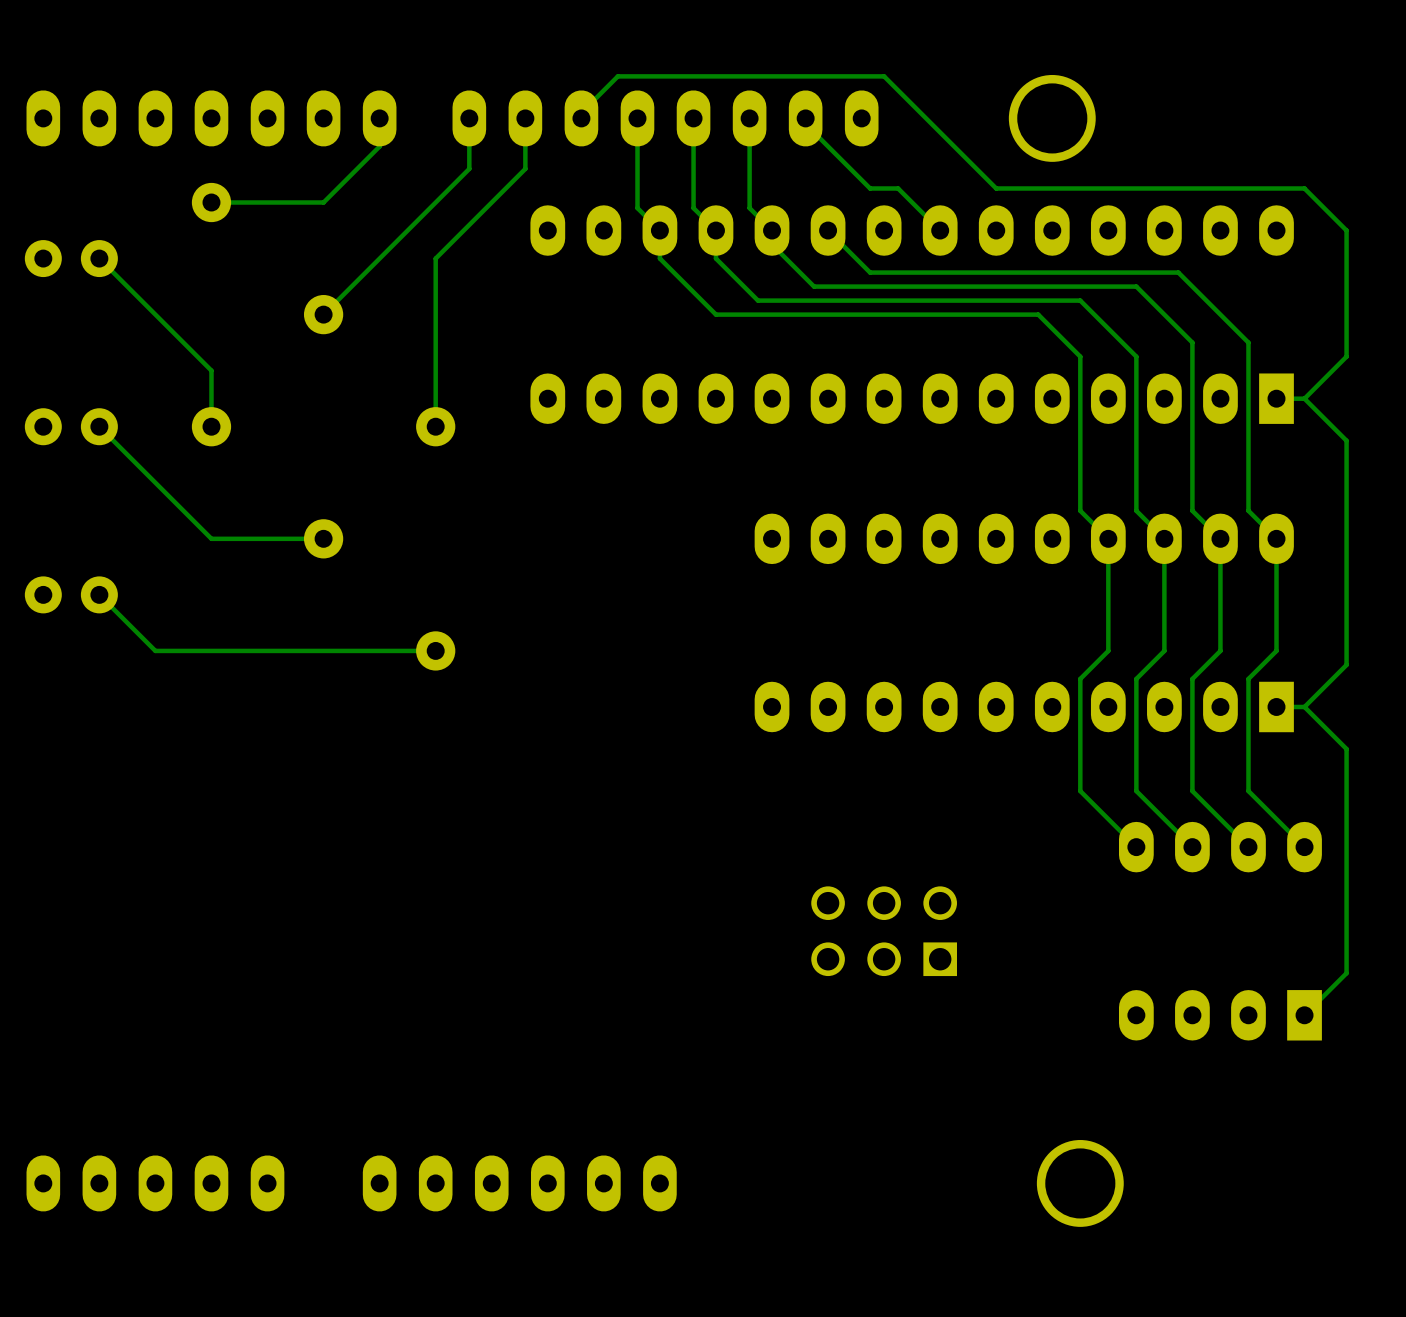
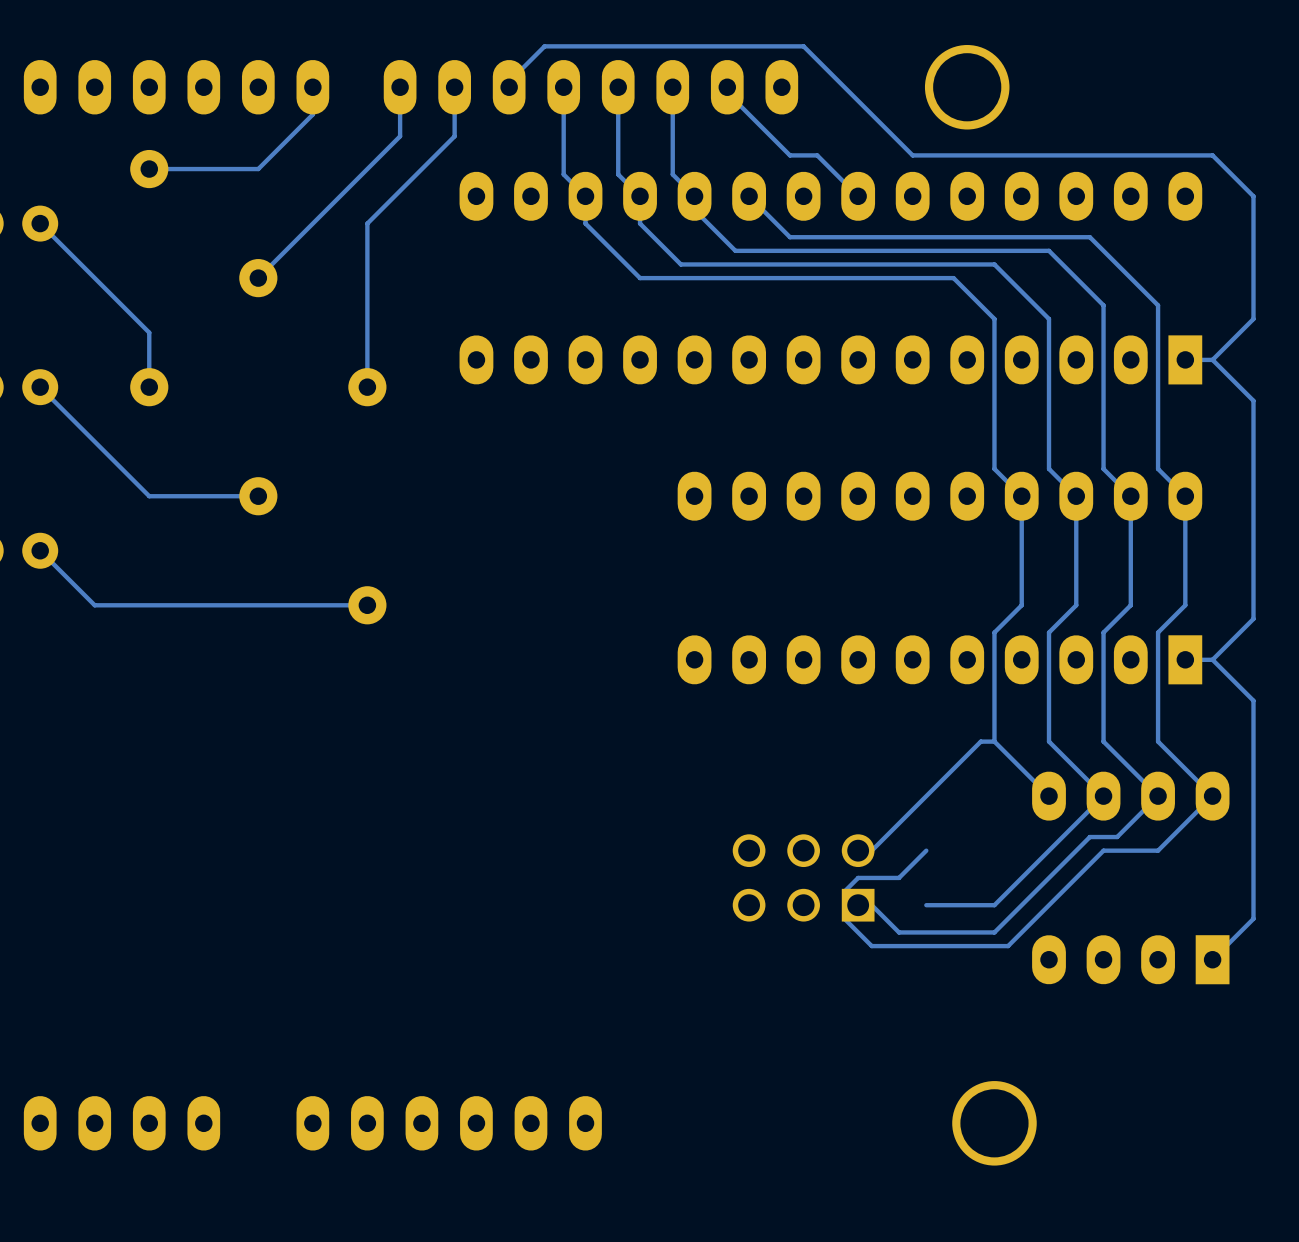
track: none -> (994, 741) (980, 741) (871, 850)
track: none -> (1103, 796) (994, 905) (926, 905)
track: none -> (1158, 796) (1117, 837) (1089, 837) (994, 932) (899, 932) (871, 905)
track: none -> (1212, 796) (1158, 850) (1103, 850) (1008, 946) (871, 946) (844, 918) (844, 891) (858, 877) (899, 877) (926, 850)

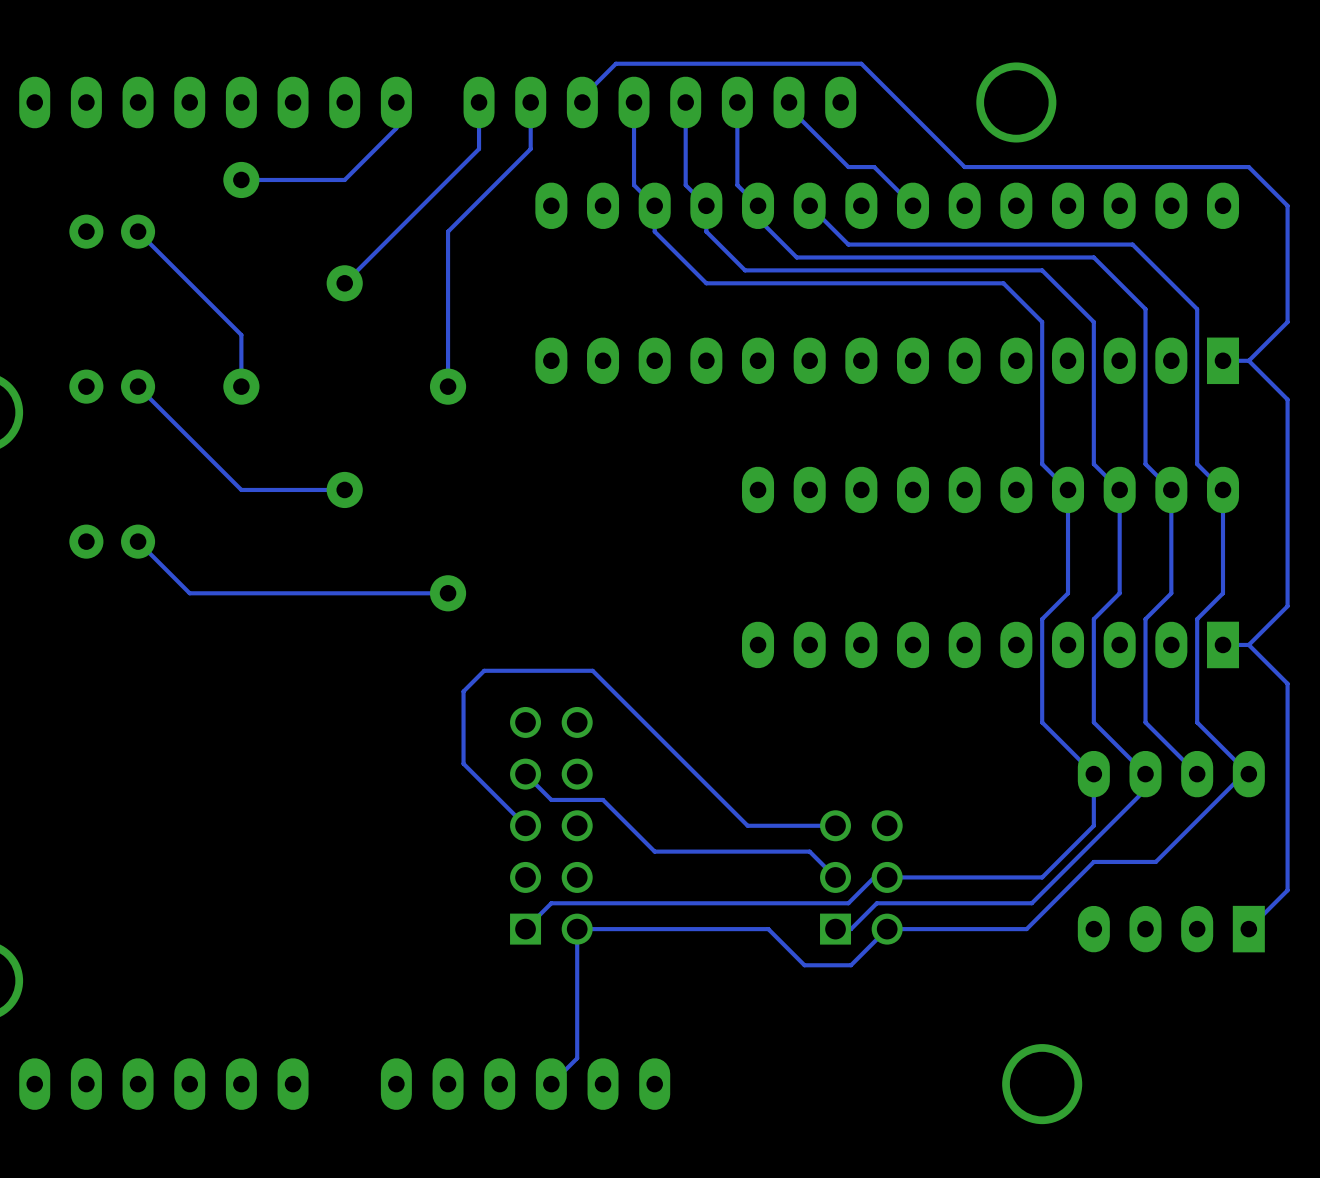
track: (994, 741) (980, 741) (871, 850) -> none
track: none -> (525, 774) (551, 799) (603, 799) (654, 851) (809, 851) (835, 877)
track: (1103, 796) (1049, 850) -> (1093, 774) (1093, 825)
track: (1158, 796) (1117, 837) (1089, 837) (994, 932) (983, 932) -> (1145, 774) (1145, 789) (1031, 903)
track: (1212, 796) (1158, 850) (1103, 850) (1008, 946) (871, 946) (844, 918) (844, 891) (858, 877) (899, 877) (926, 850) -> (1248, 774) (1243, 774) (1155, 861) (1093, 861) (1026, 929) (887, 929) (851, 965) (804, 965) (768, 929) (577, 929) (577, 1058) (551, 1084)
part: none -> (551, 825)
track: none -> (835, 825) (747, 825) (592, 670) (484, 670) (463, 691) (463, 763) (525, 825)
part rotation: 0° (803, 877) -> 90° clockwise (861, 877)
track: (871, 905) (899, 932) -> (835, 929) (851, 929) (876, 903) (951, 903)
track: none -> (977, 877) (874, 877) (848, 903) (551, 903) (525, 929)

